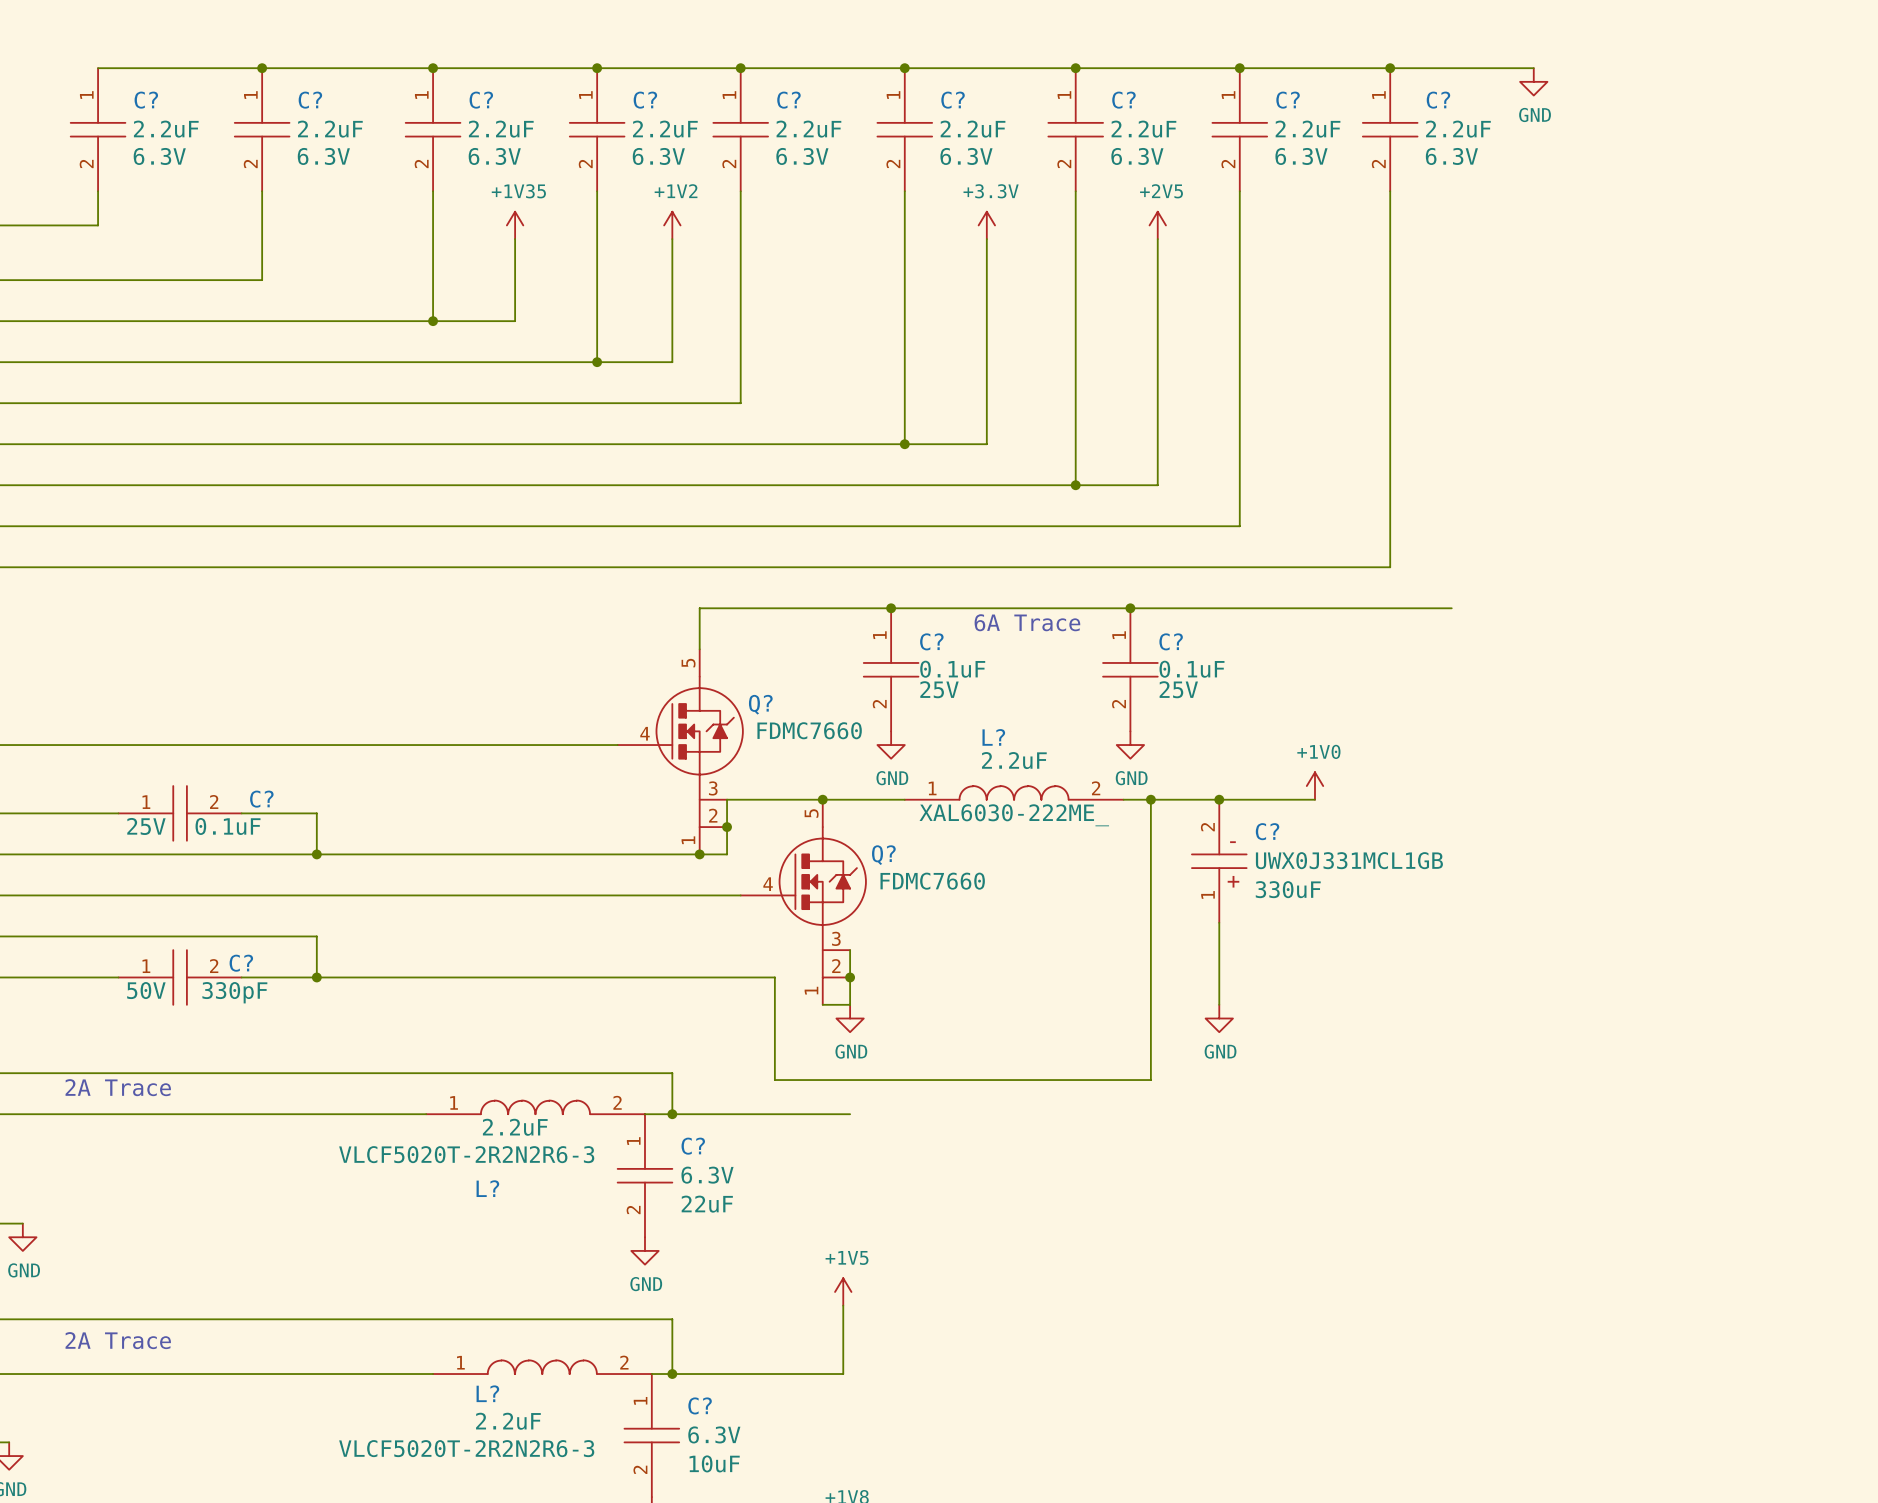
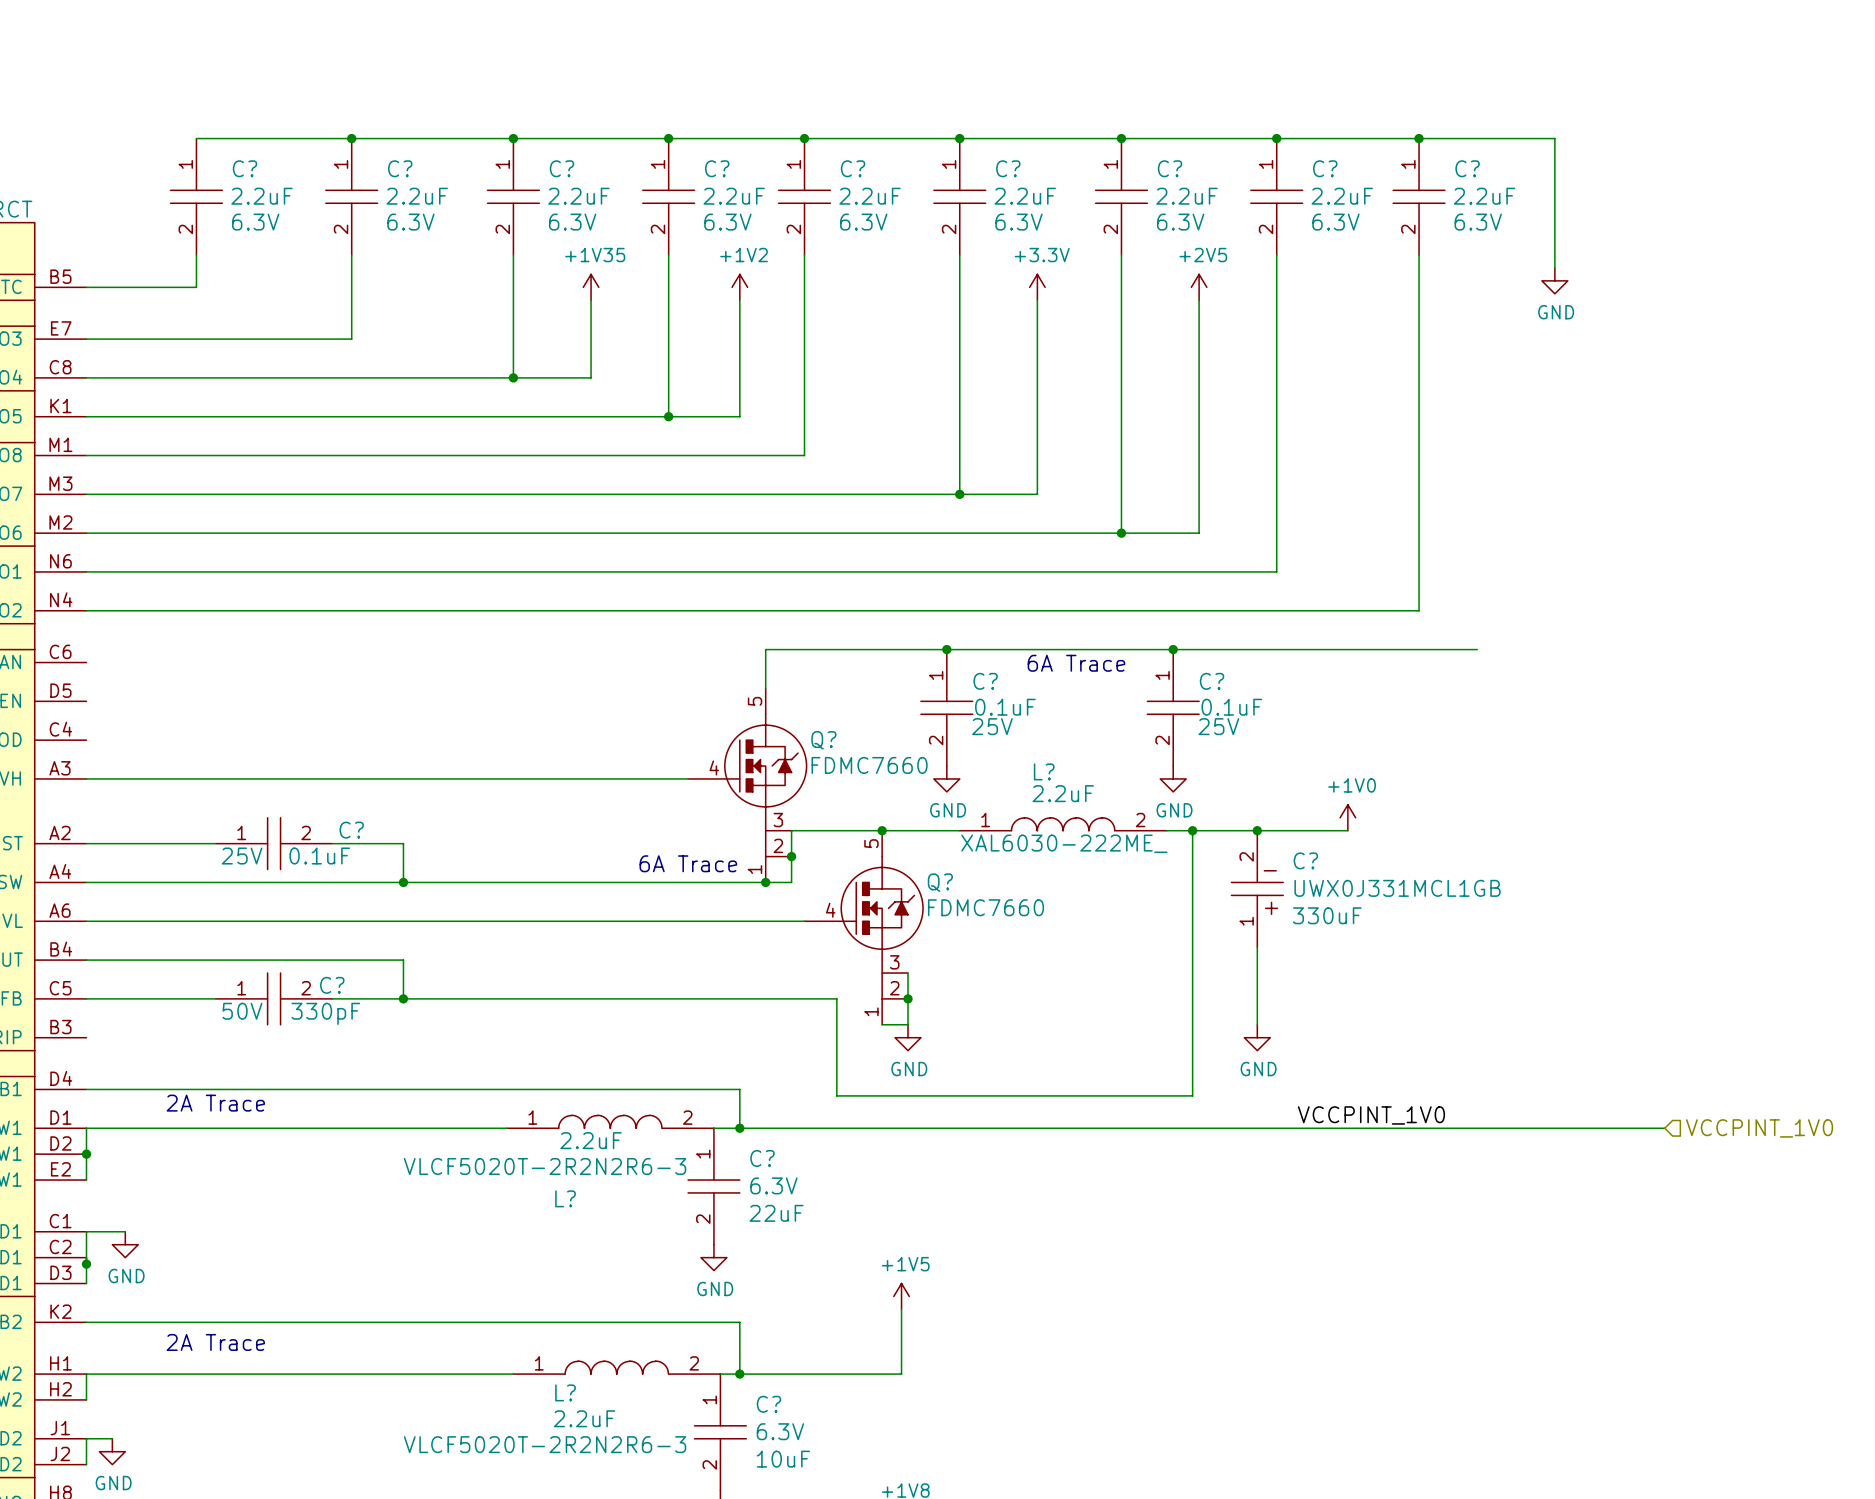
wire: none -> (1554, 138) (1554, 267)
power symbol position: GND (1533, 81) -> GND (1554, 280)
text: none -> 6A Trace (688, 863)
label: none -> VCCPINT_1V0 (1371, 1115)
wire: none -> (908, 1128) (1664, 1128)
hierarchical label: none -> VCCPINT_1V0 (1759, 1128)

